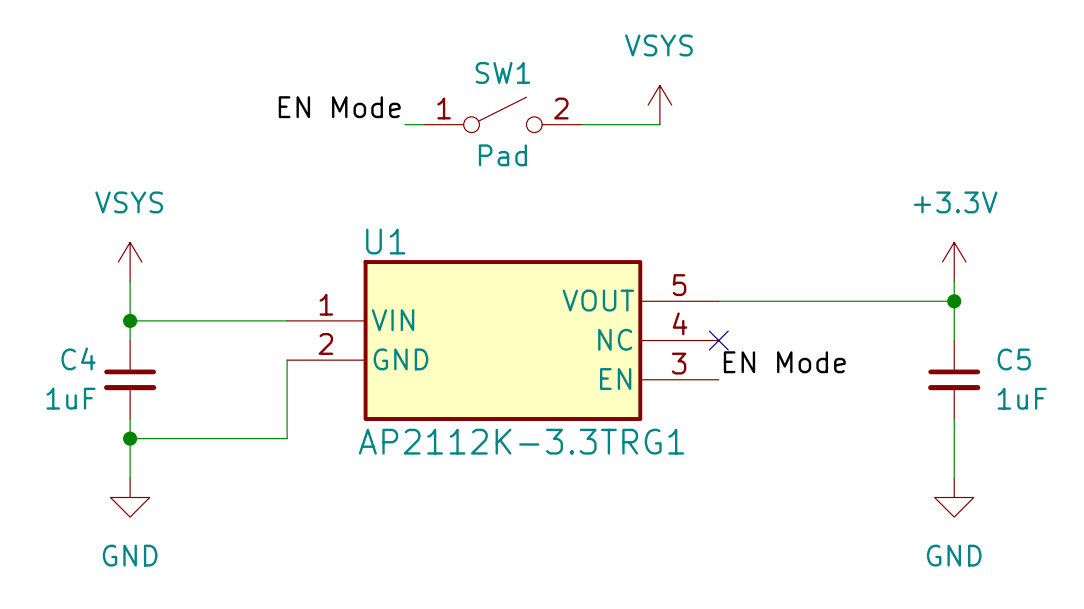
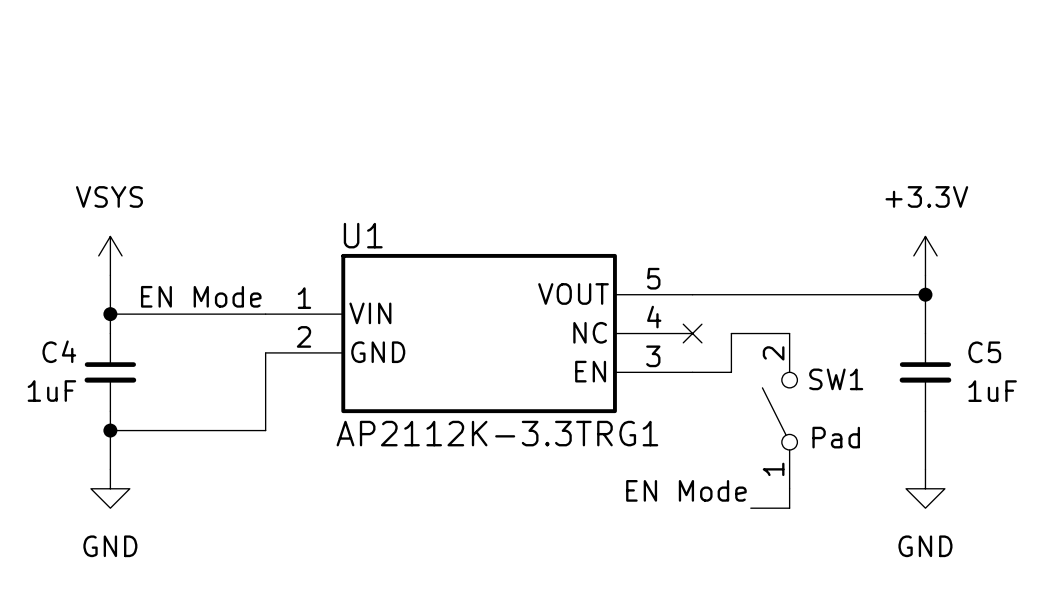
SW1 name position: SW1 (502, 72) -> SW1 (836, 379)
power symbol: VSYS (659, 105) -> none
label: EN Mode (339, 107) -> none
SW1 rotation: 0° (502, 114) -> 90° counterclockwise (779, 411)
SW1 position: (502, 114) -> (779, 411)
wire: (404, 124) (424, 124) -> none
wire: (581, 124) (659, 124) -> none
SW1 value position: Pad (502, 155) -> Pad (836, 437)
label: none -> EN Mode (201, 296)
wire: none -> (789, 333) (731, 333) (731, 372) (692, 372)
label position: EN Mode (784, 362) -> EN Mode (686, 490)
wire: none -> (789, 488) (789, 508) (750, 508)

